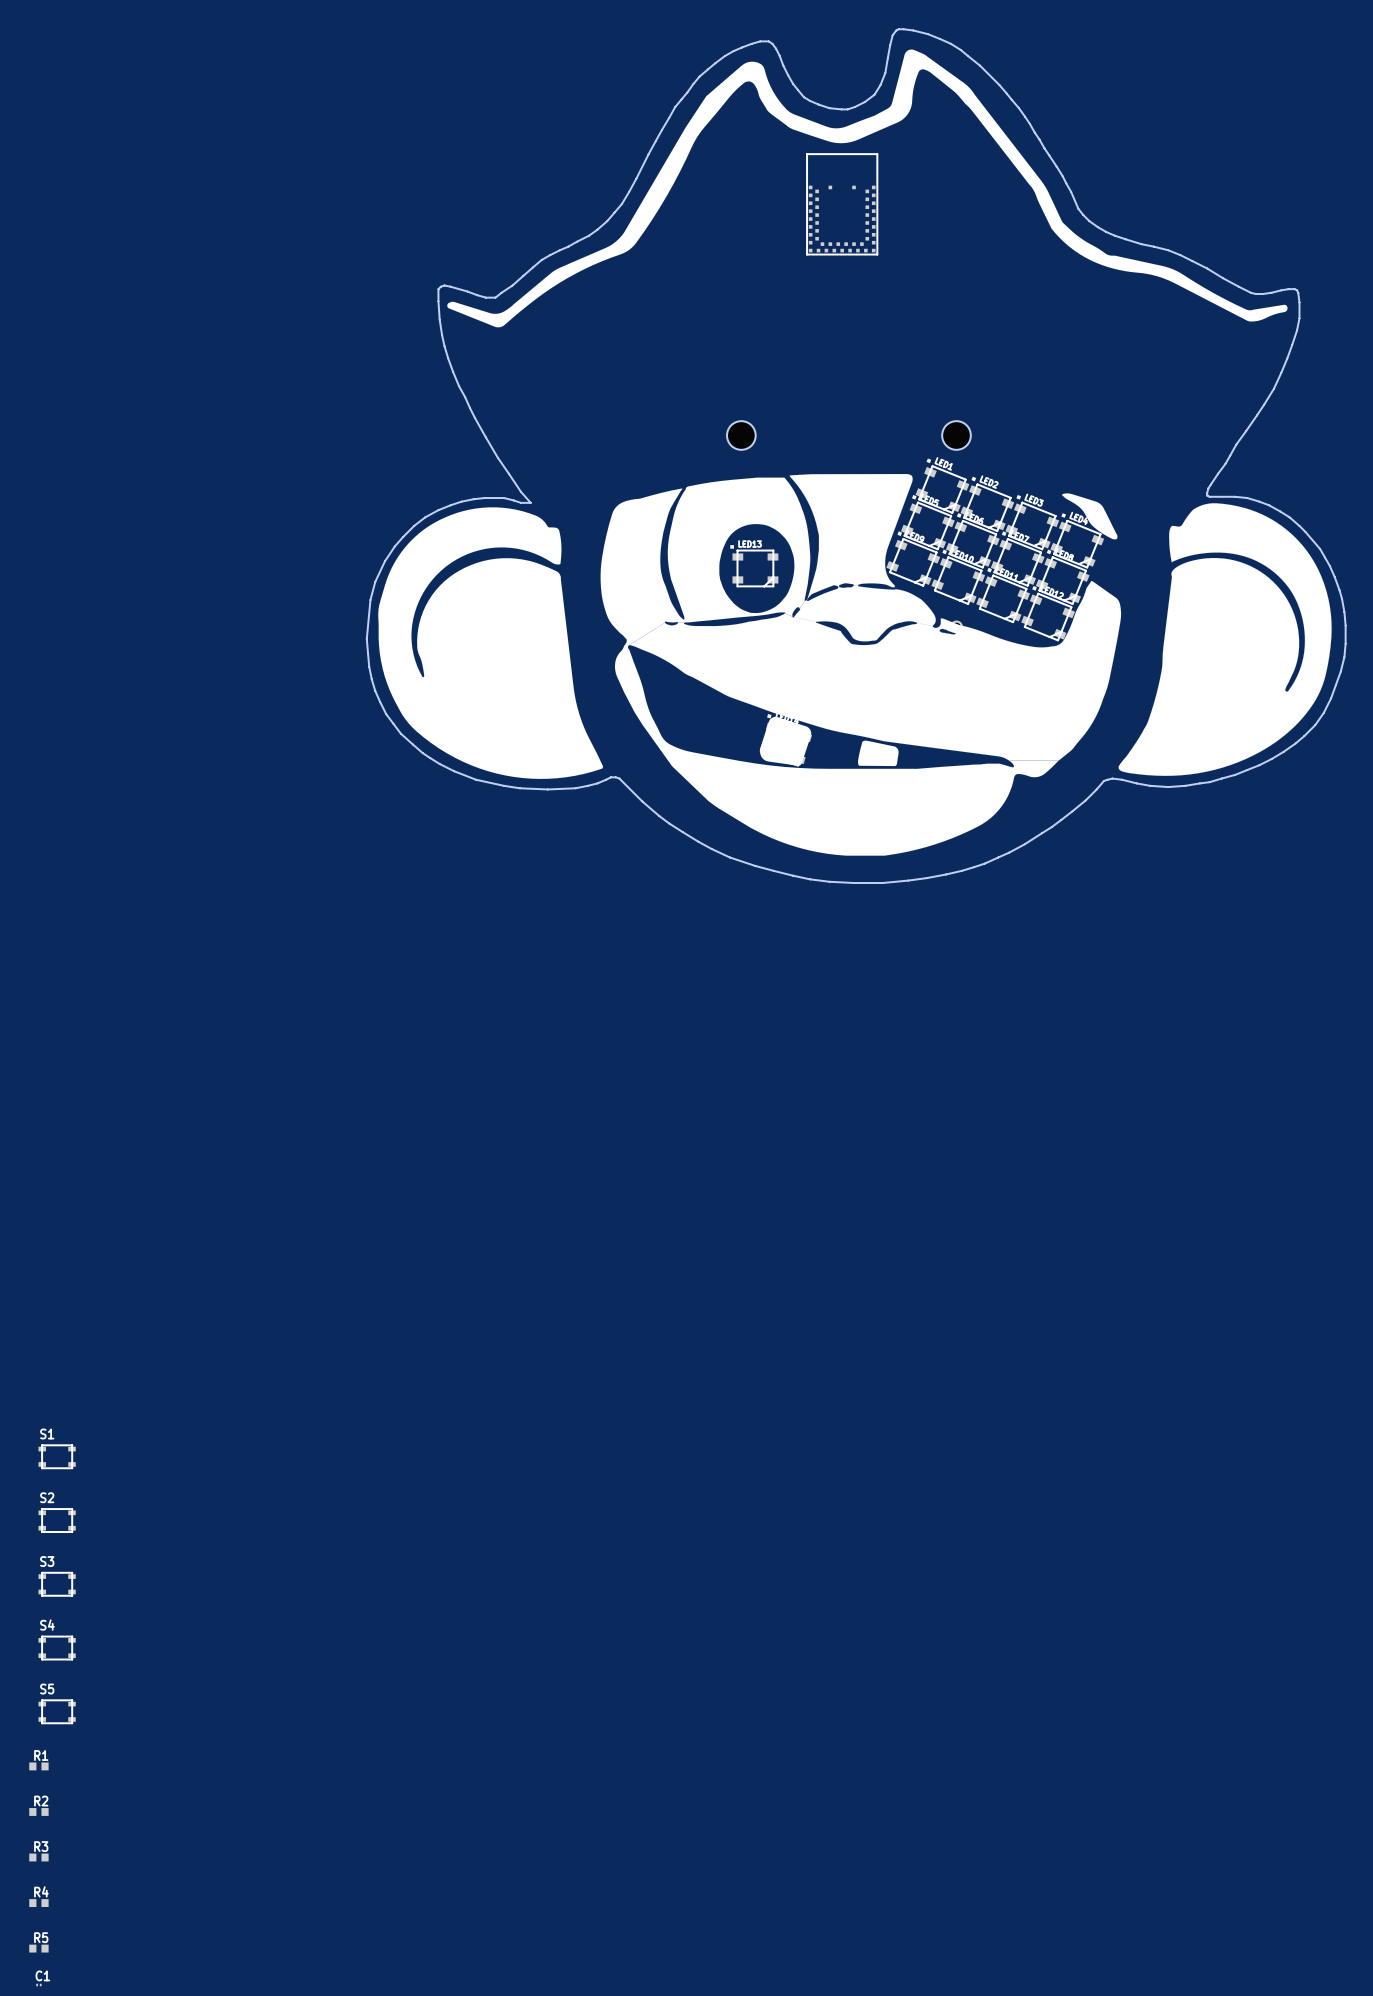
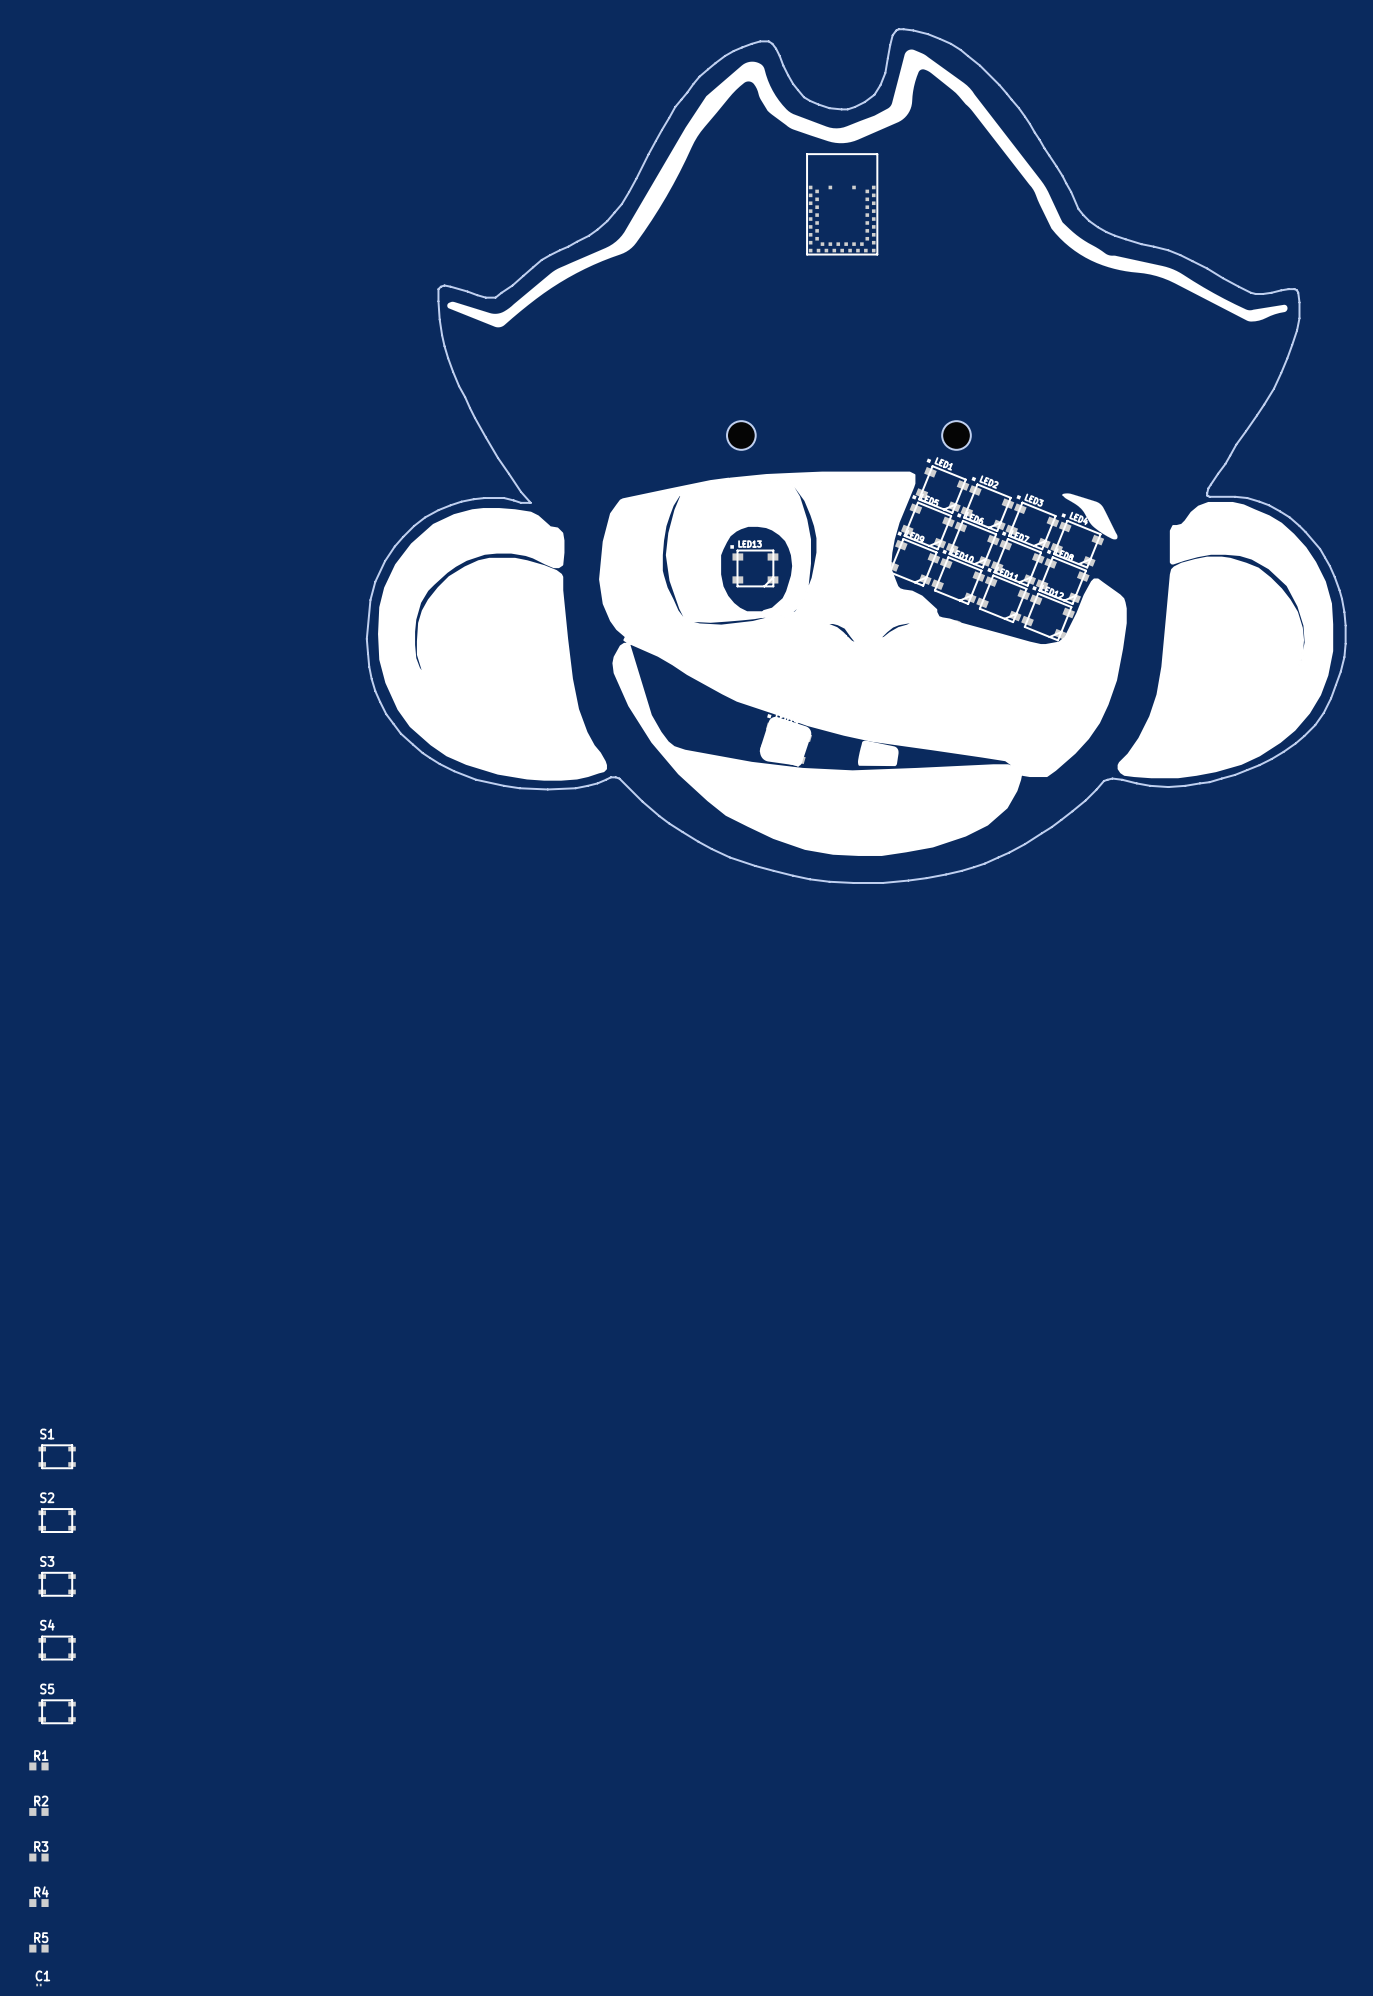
drawing: none -> [599, 471, 1127, 856]
drawing: [600, 474, 1122, 856] -> none
drawing shape: [1118, 503, 1332, 776] -> [1117, 501, 1334, 779]
drawing shape: [378, 507, 603, 779] -> [378, 508, 607, 781]

